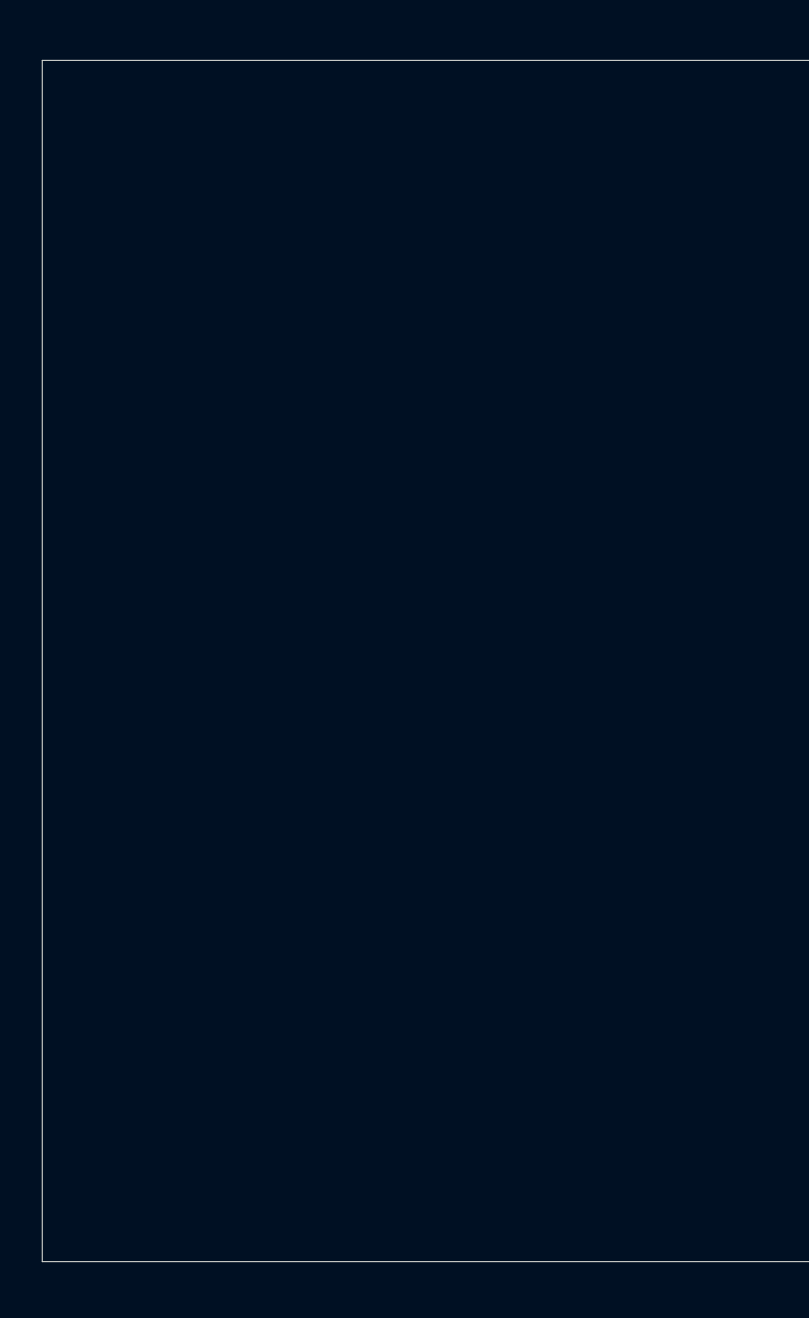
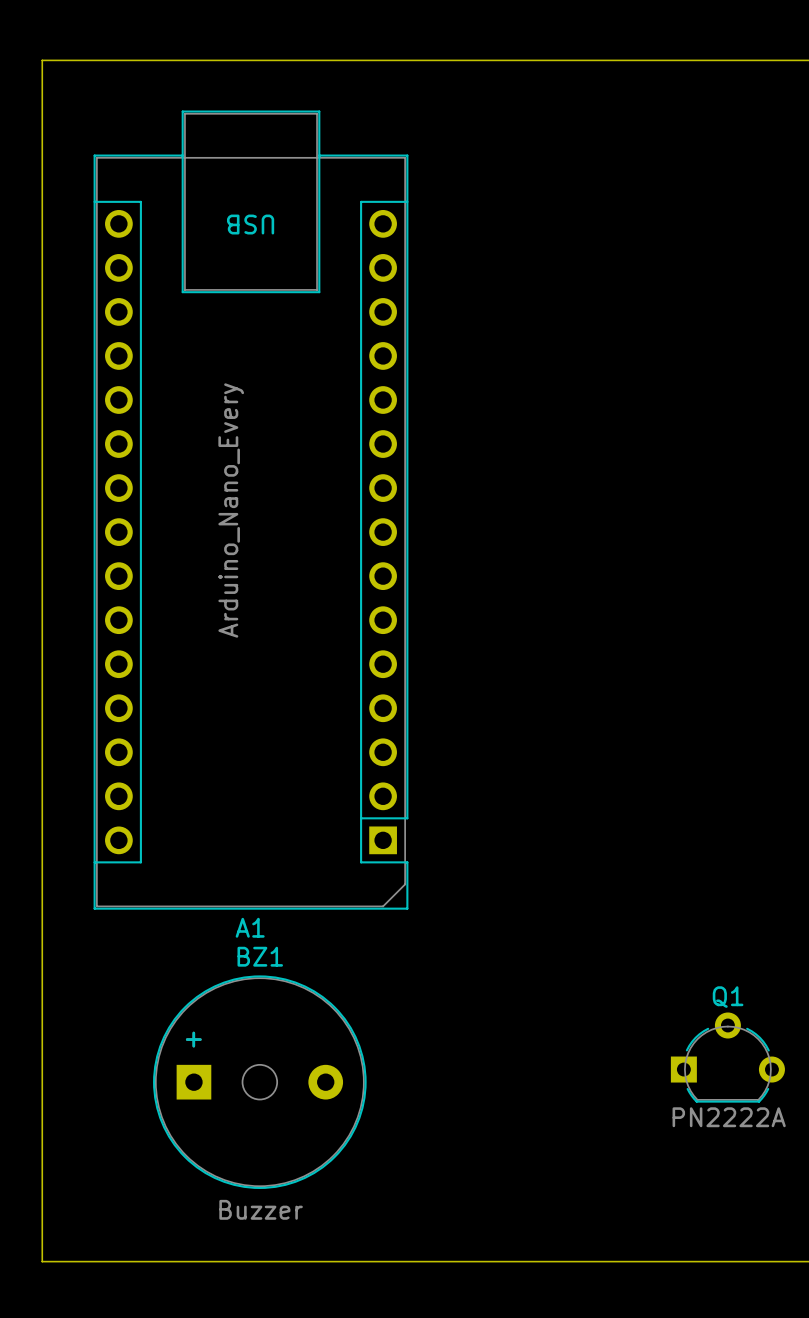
A1: none -> Arduino_Nano_Every (251, 510)
Q1: none -> PN2222A (727, 1057)
BZ1: none -> Buzzer (259, 1082)

